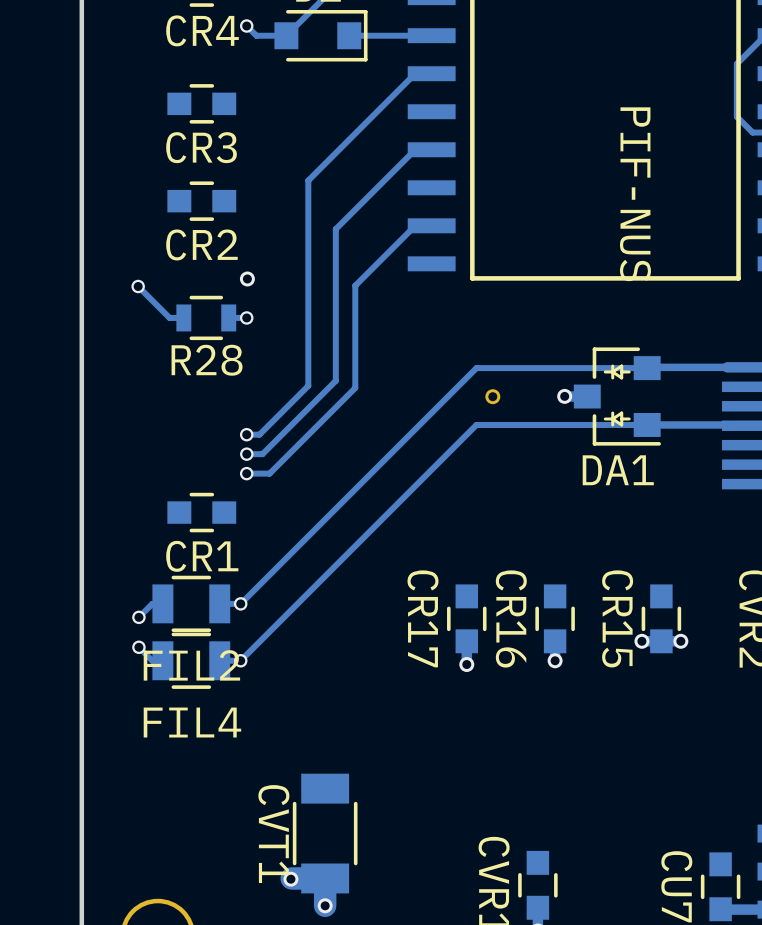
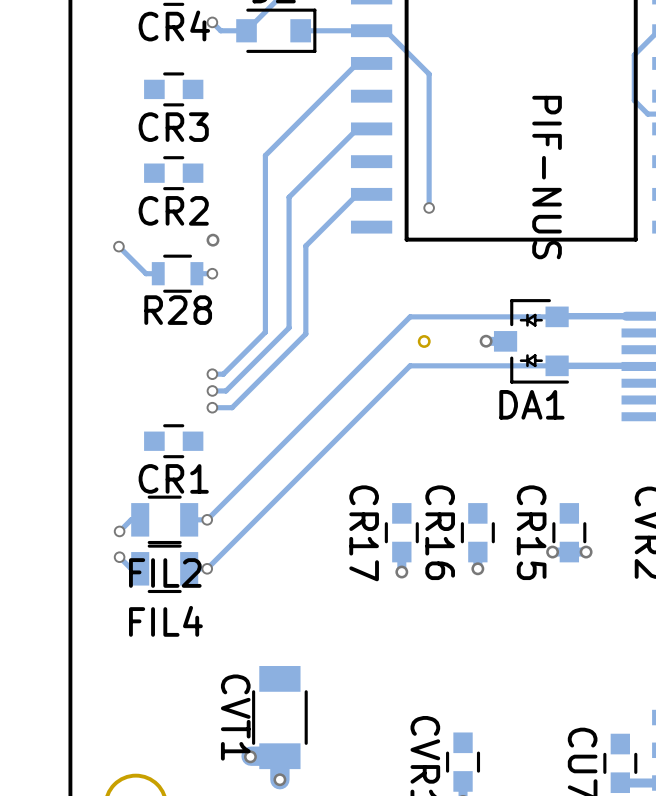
track: none -> (371, 30) (385, 30) (429, 74) (429, 207)
via: none -> (429, 207)

